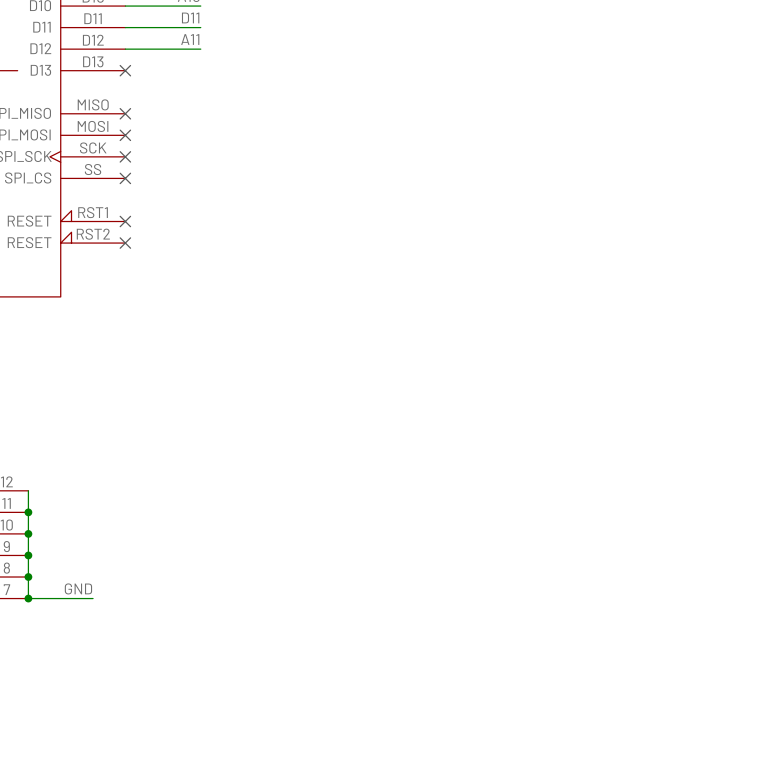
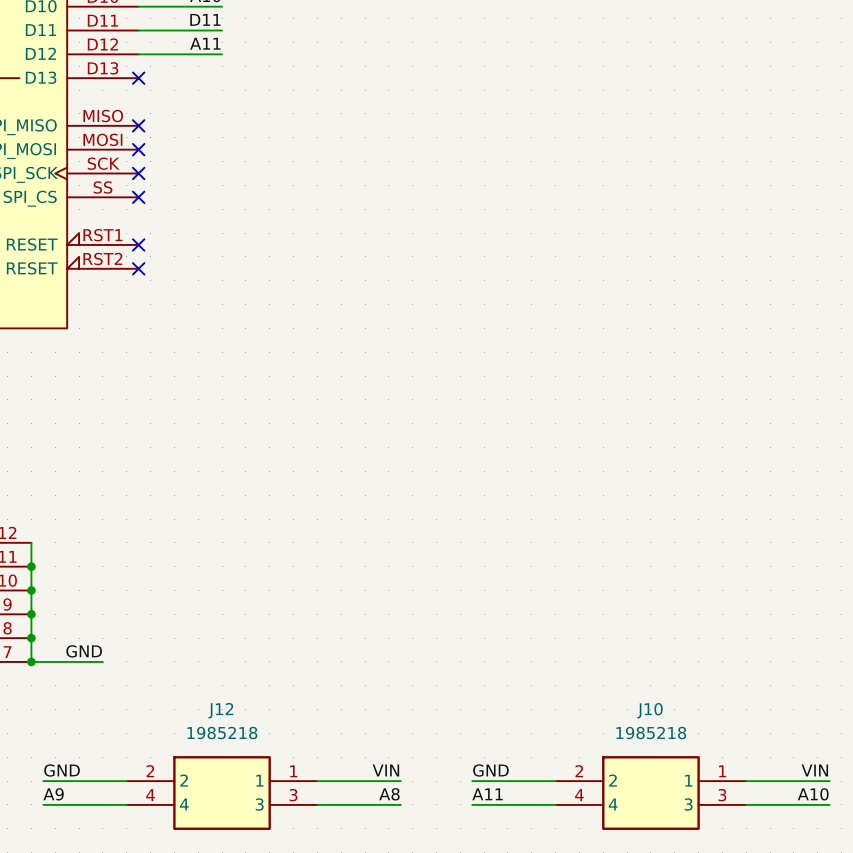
label: none -> GND (62, 770)
label: none -> VIN (385, 770)
label: none -> GND (490, 770)
label: none -> VIN (814, 770)
wire: none -> (43, 781) (126, 781)
wire: none -> (317, 781) (400, 781)
wire: none -> (472, 781) (555, 781)
wire: none -> (746, 781) (829, 781)
J12: none -> 1985218 (222, 793)
J10: none -> 1985218 (650, 793)
label: none -> A9 (53, 794)
label: none -> A8 (389, 794)
label: none -> A11 (487, 794)
label: none -> A10 (813, 794)
wire: none -> (43, 804) (126, 804)
wire: none -> (317, 804) (400, 804)
wire: none -> (472, 804) (555, 804)
wire: none -> (746, 804) (829, 804)

